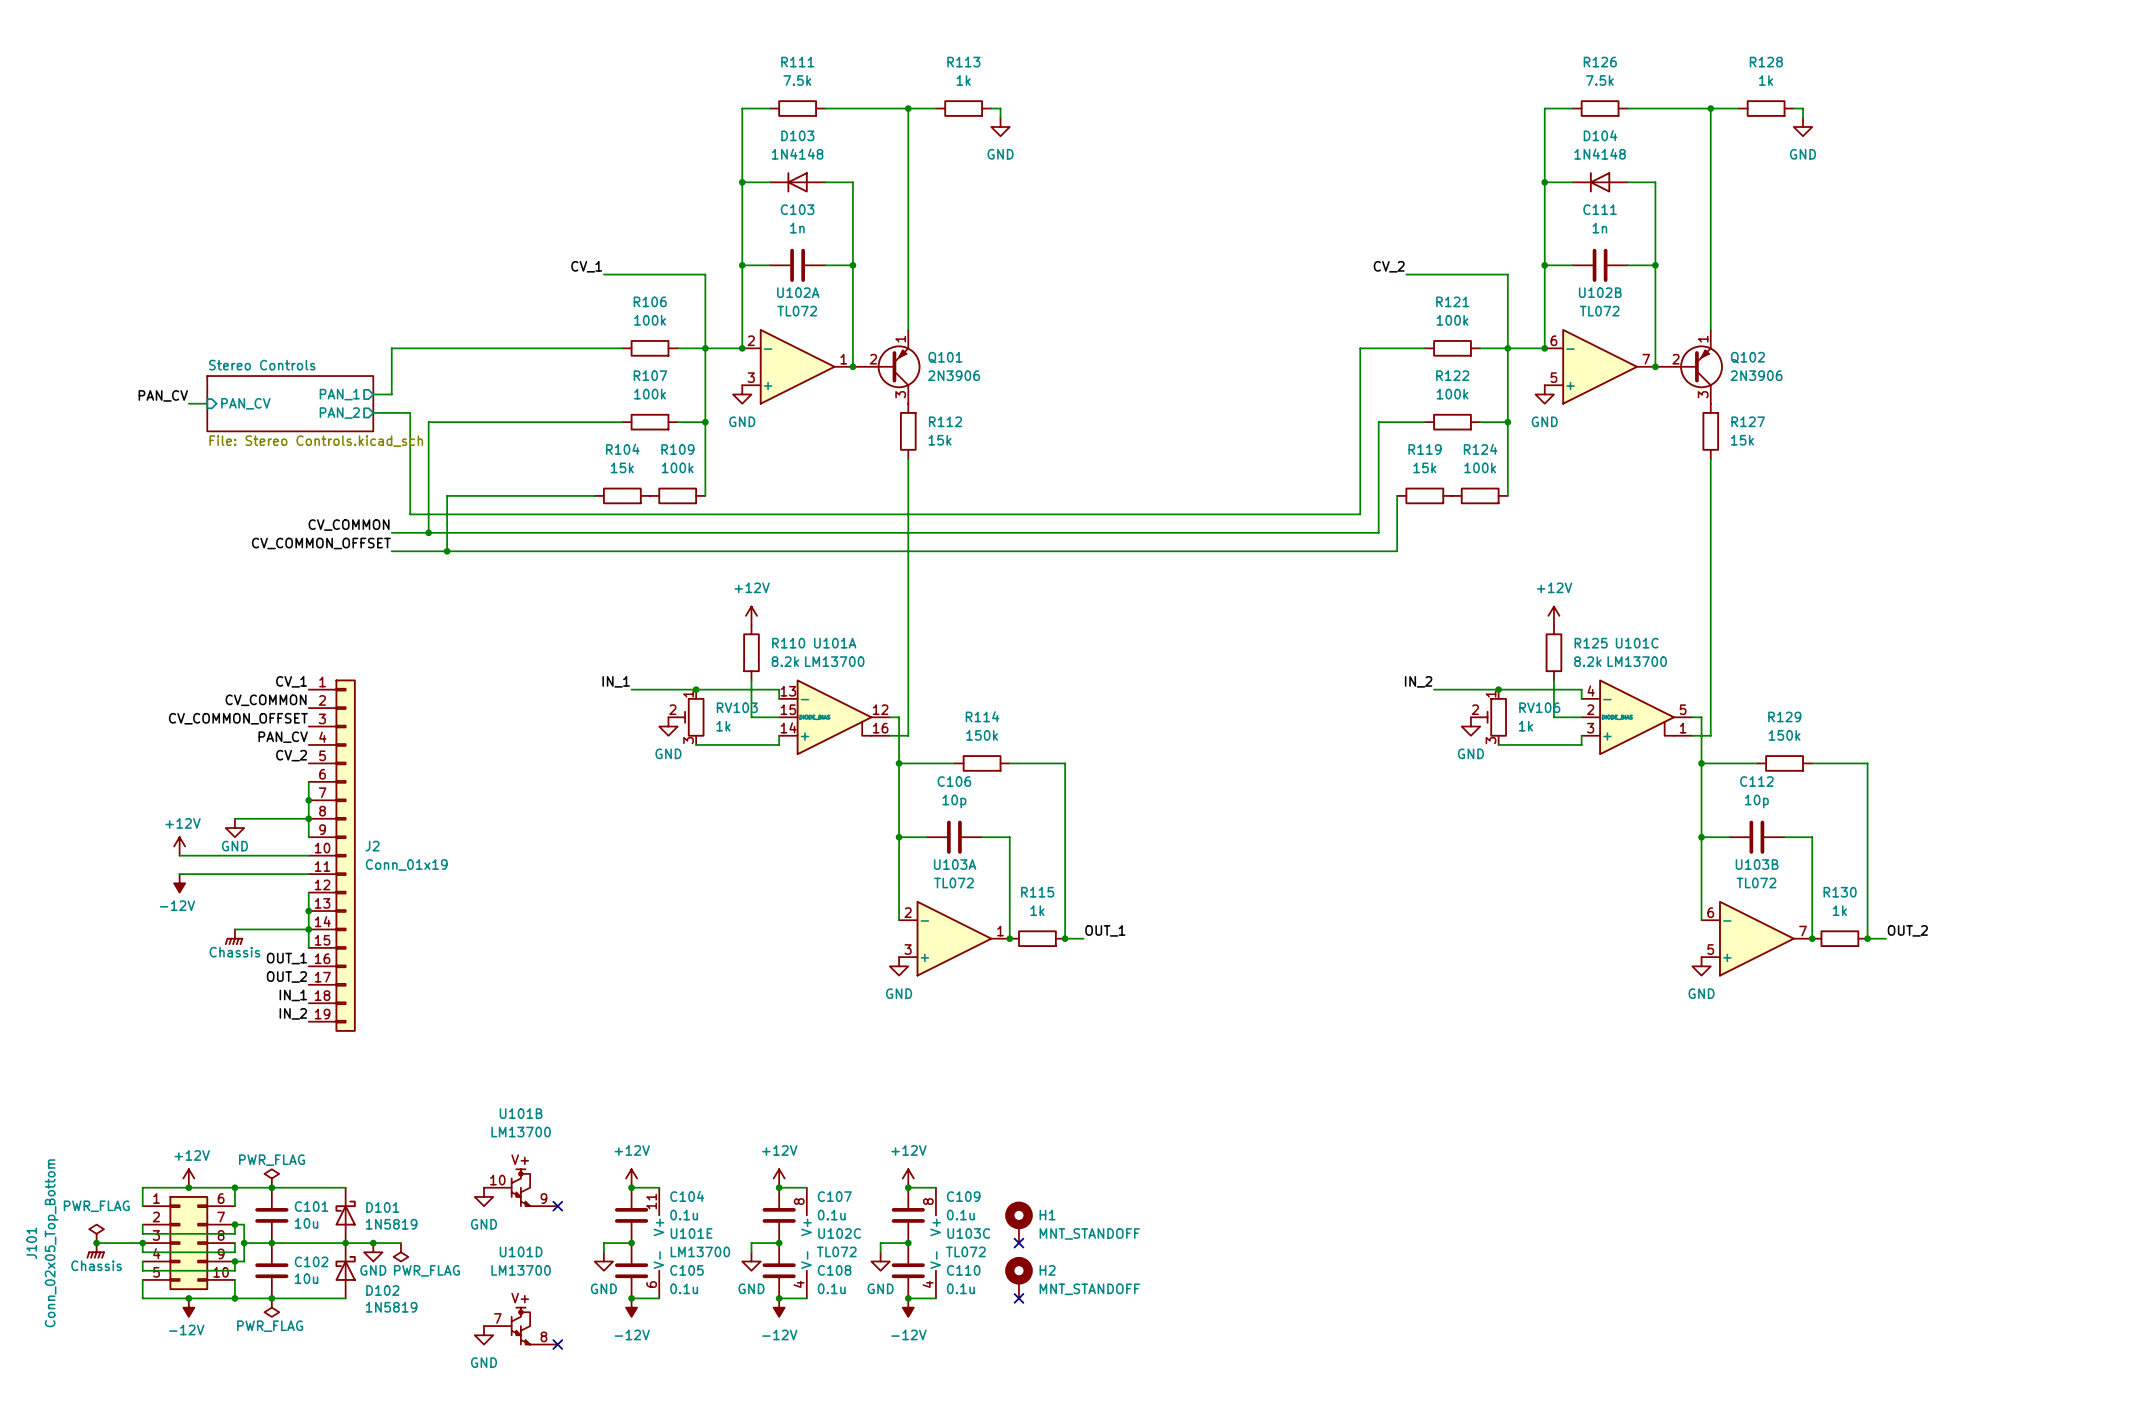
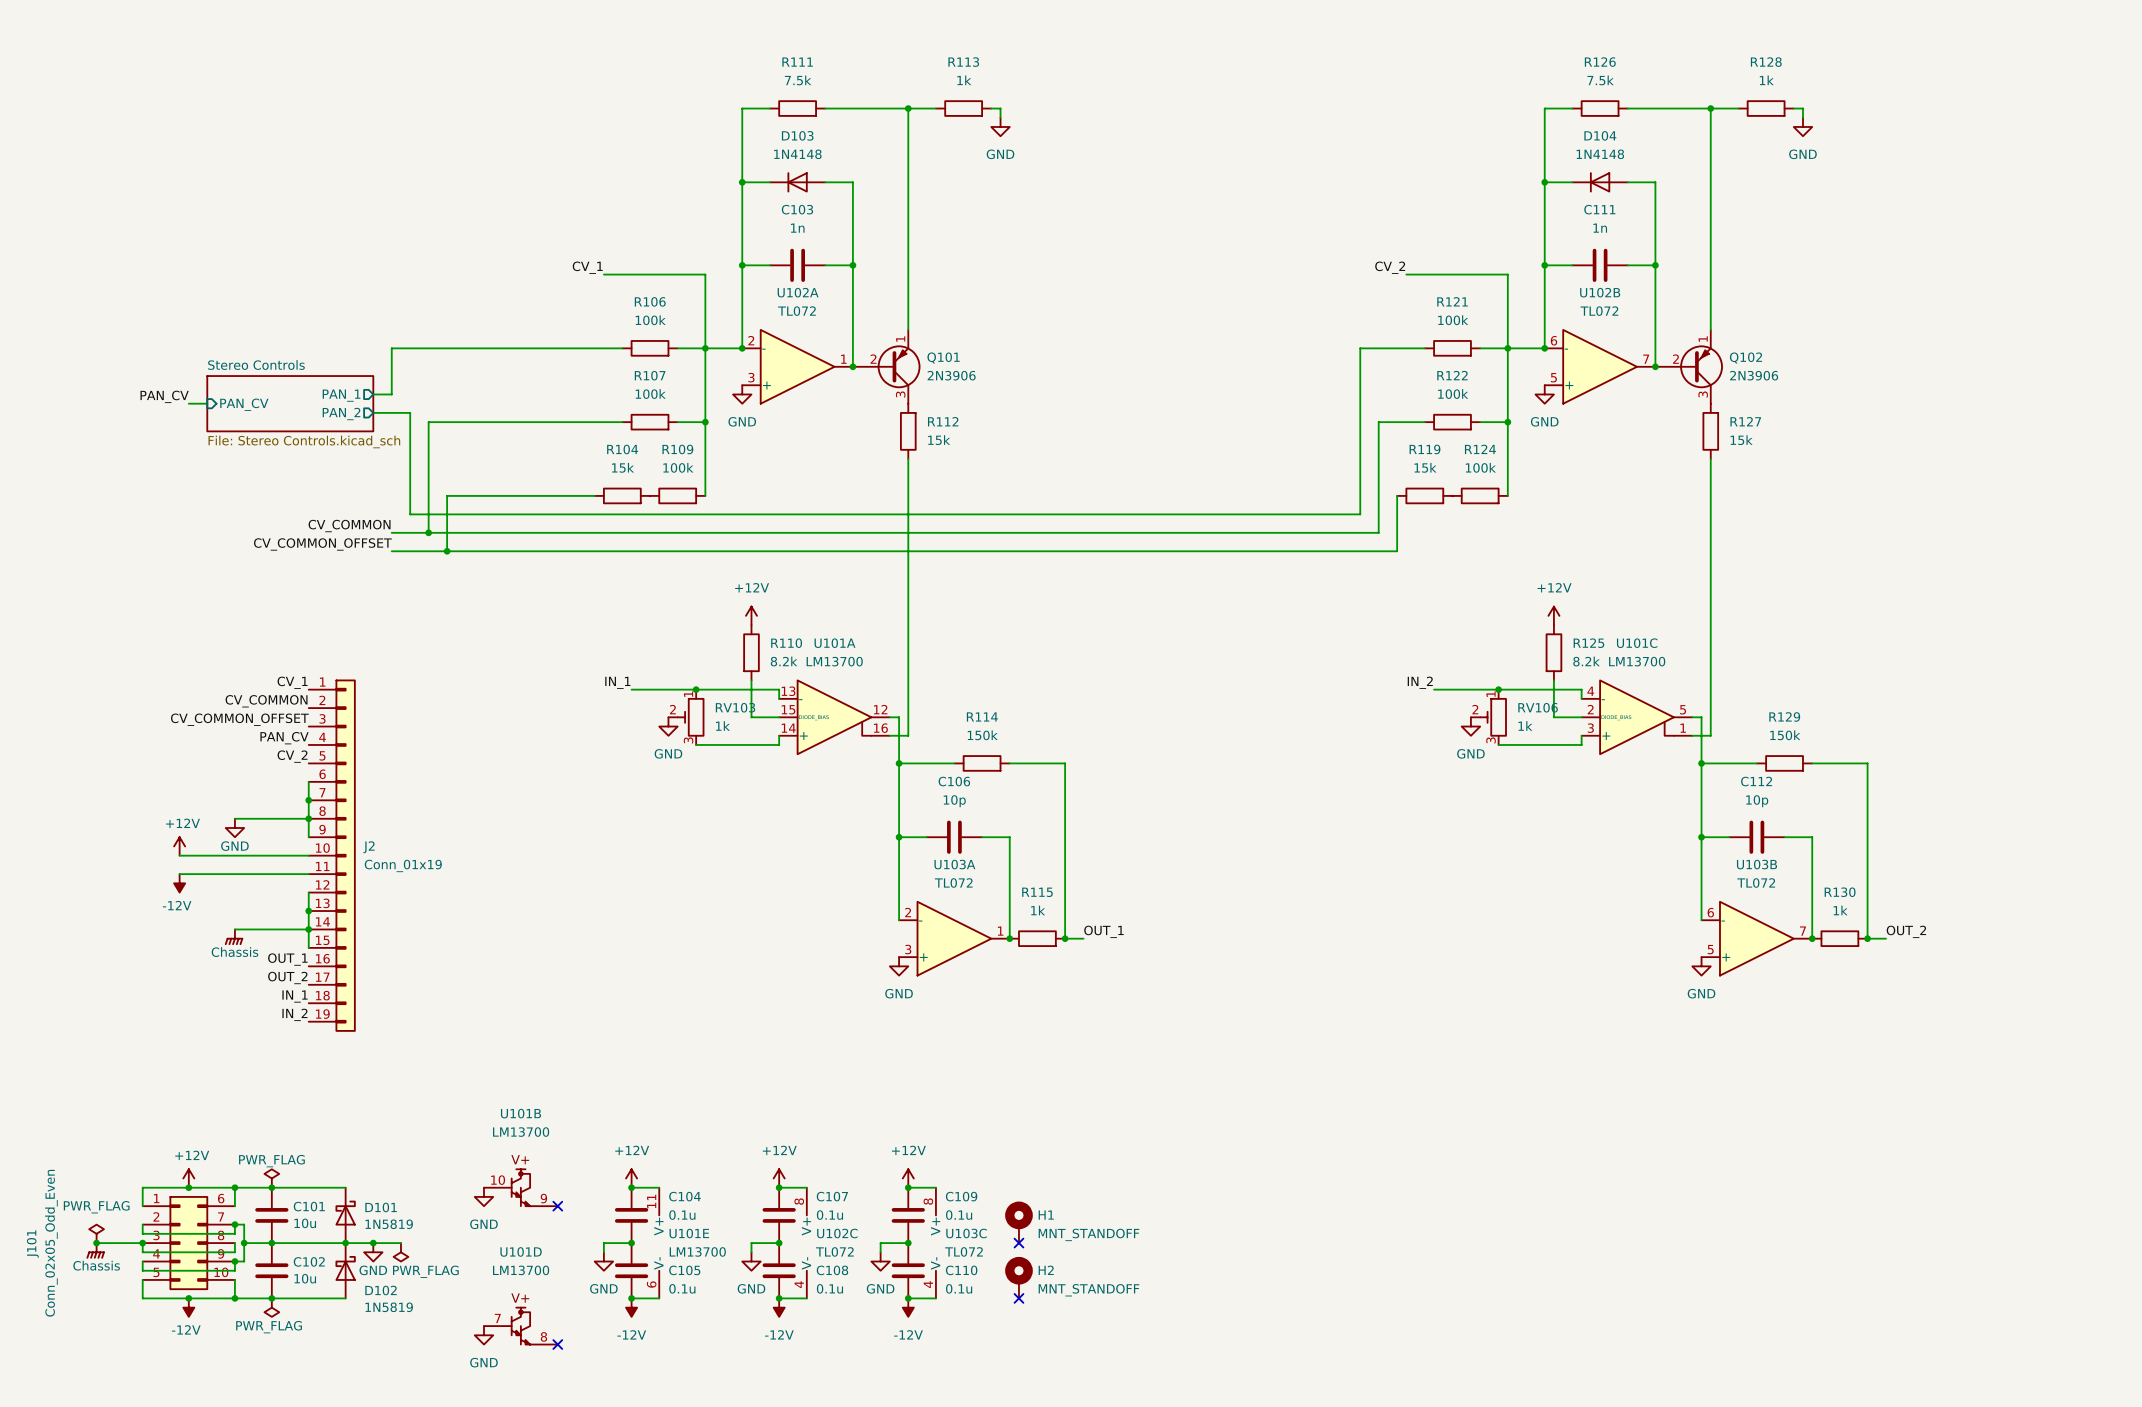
J101 value: Conn_02x05_Top_Bottom (51, 1243) -> Conn_02x05_Odd_Even (51, 1243)

